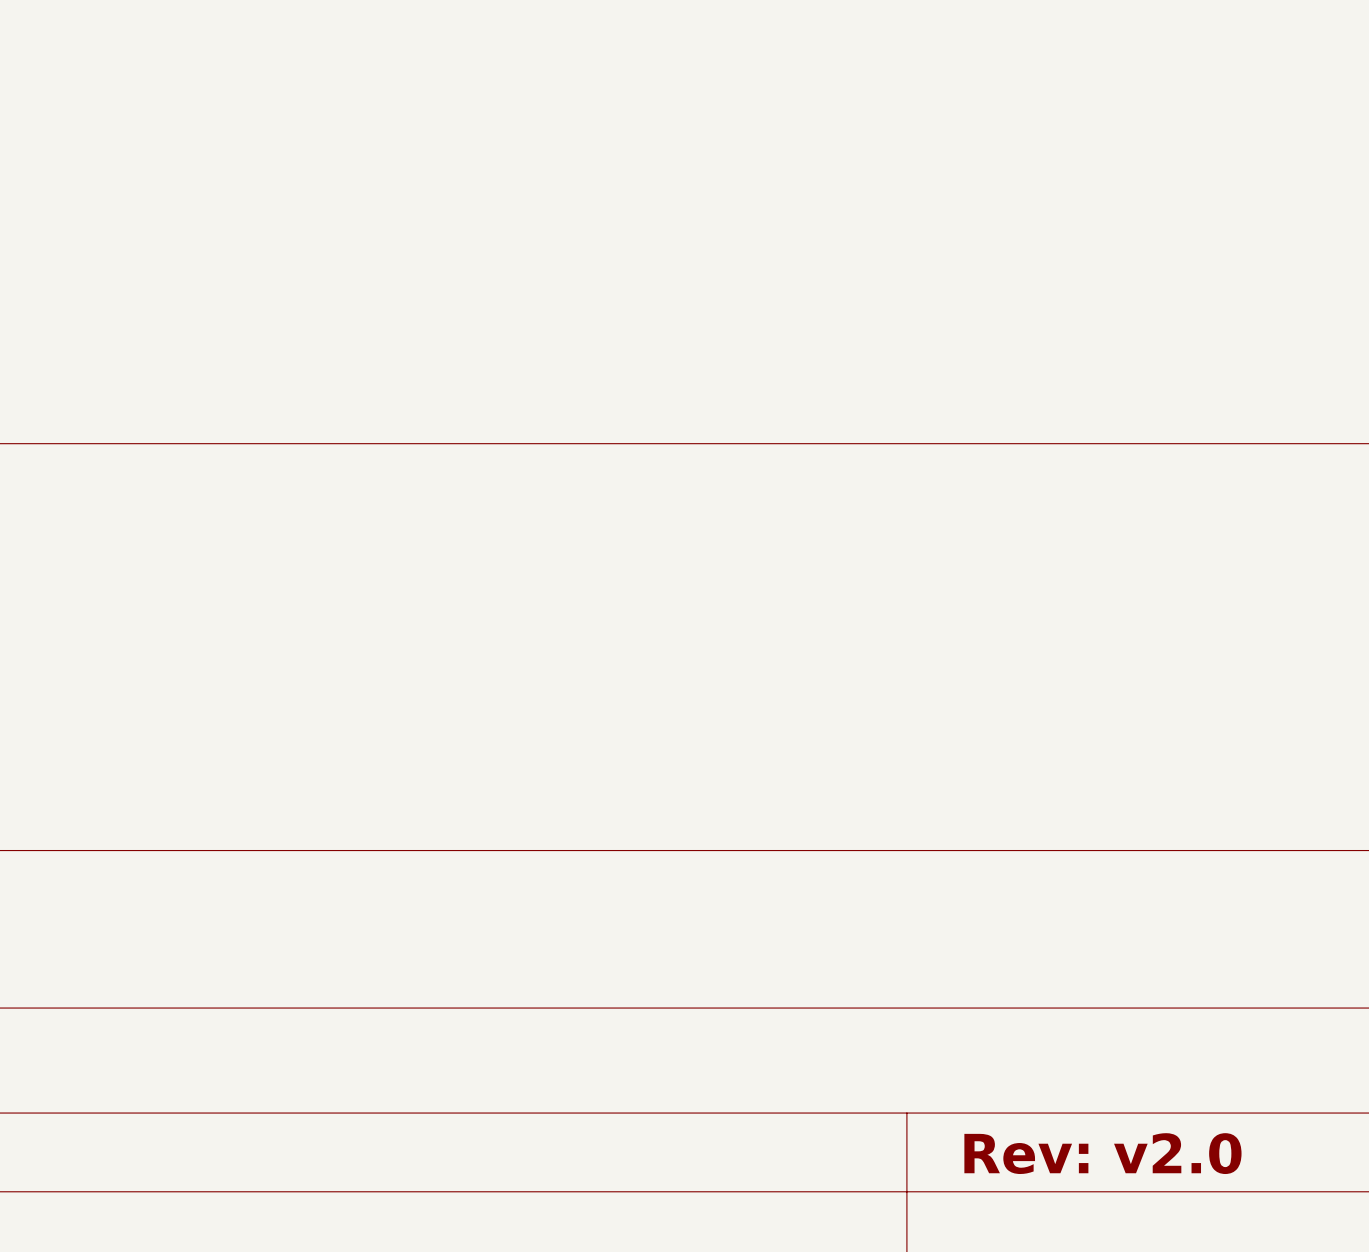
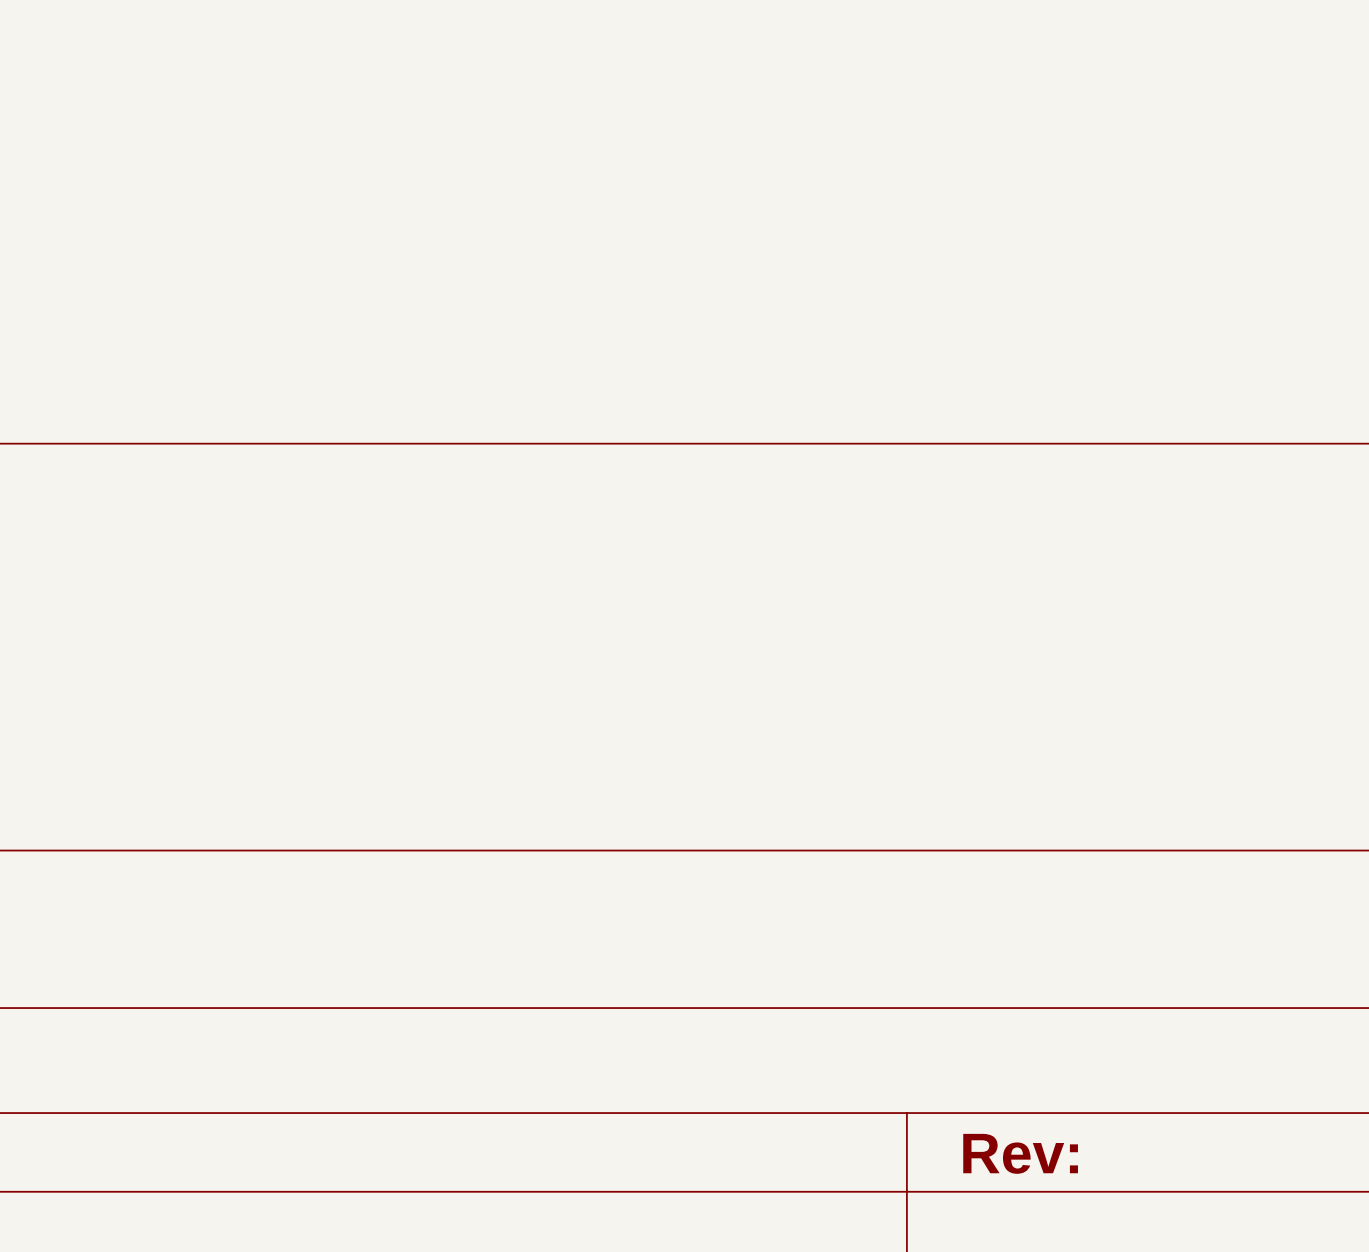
title block: Rev: v2.0 (1102, 1153) -> Rev: (1020, 1153)

